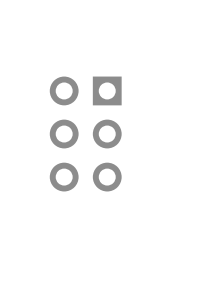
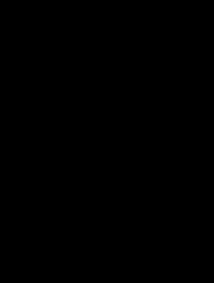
part: (85, 134) -> none

